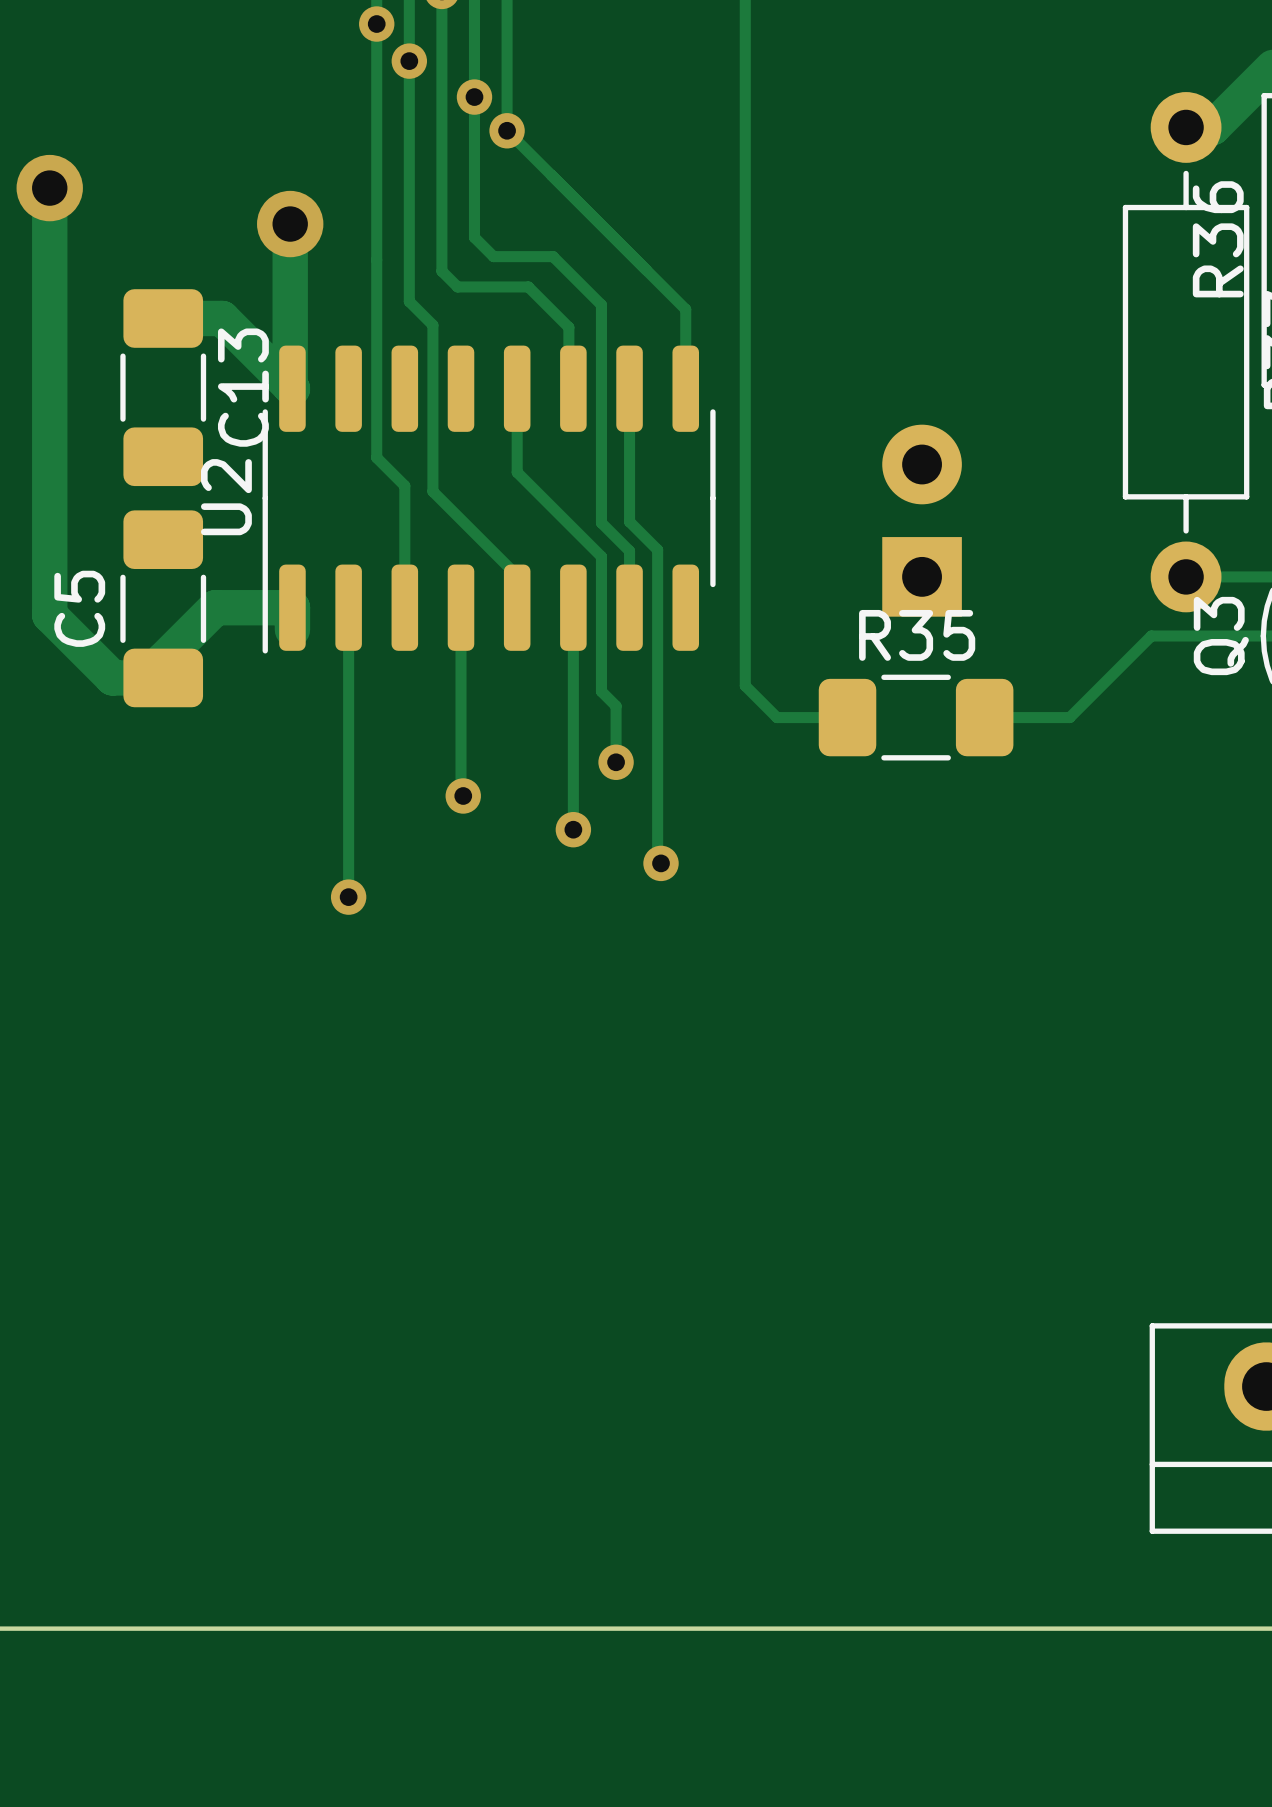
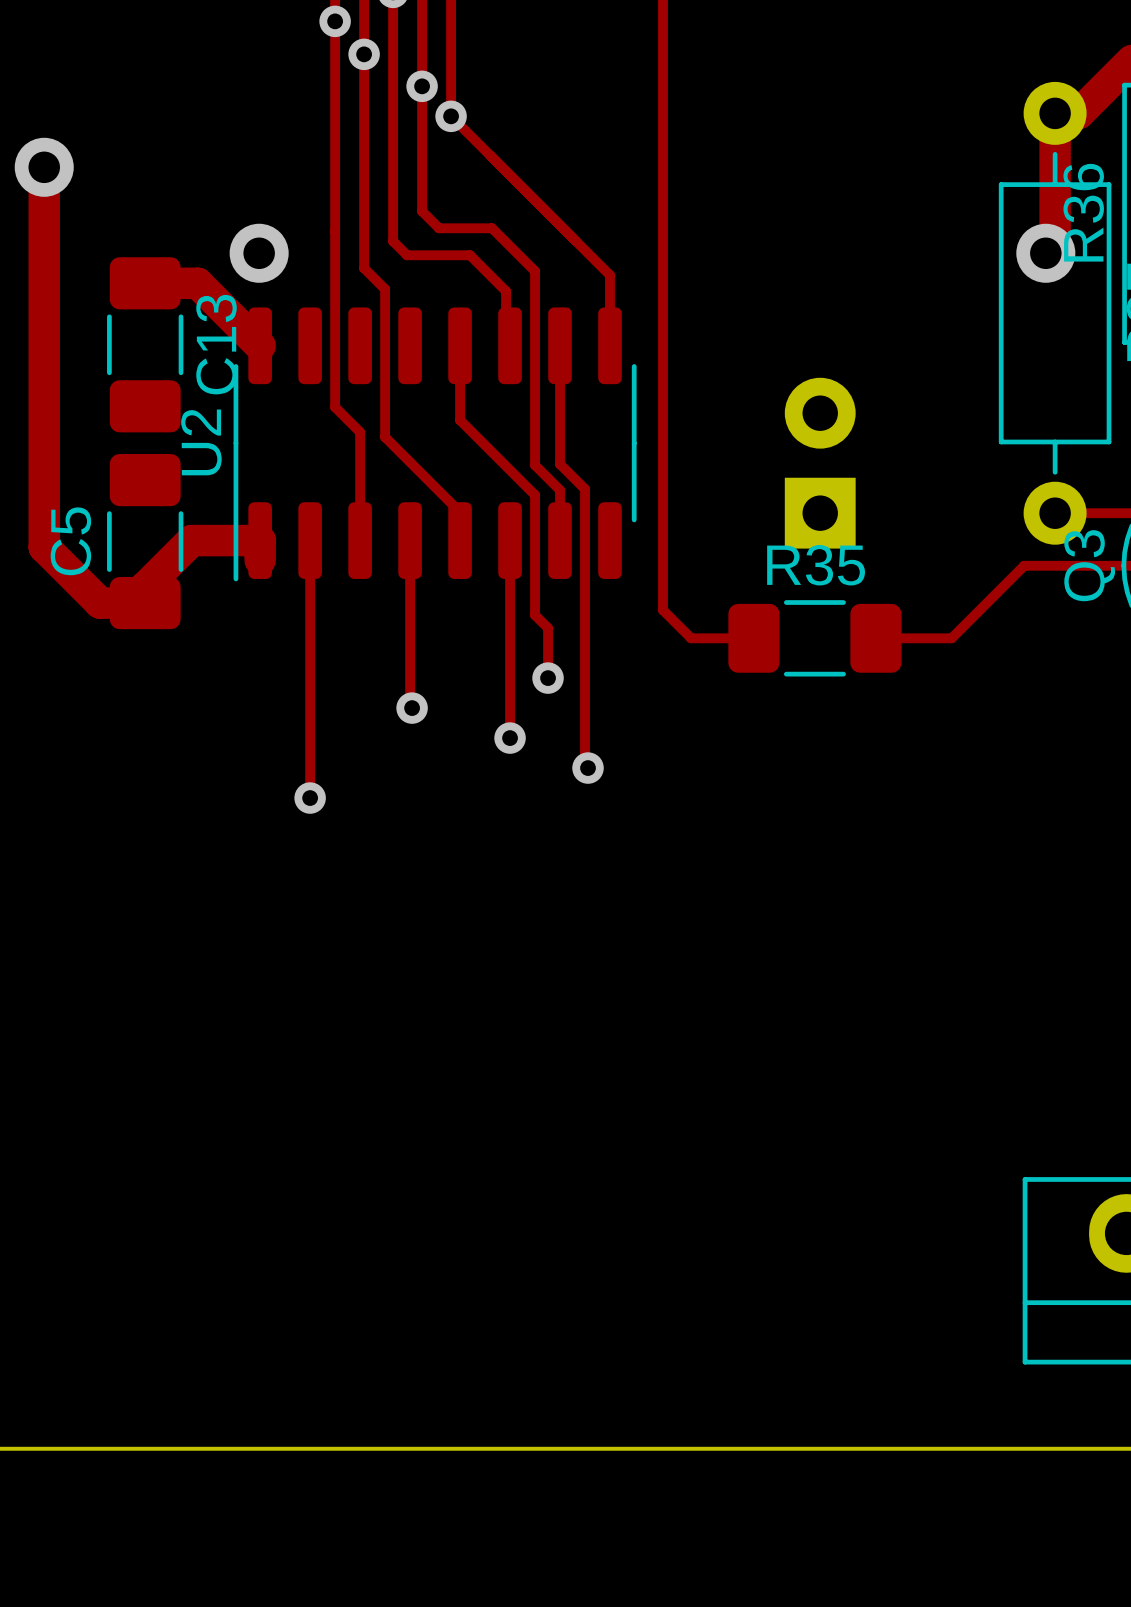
track: none -> (1055, 113) (1055, 244) (1045, 253)
track: (290, 224) (290, 386) -> none
via position: (290, 224) -> (259, 253)
via: none -> (1045, 253)

